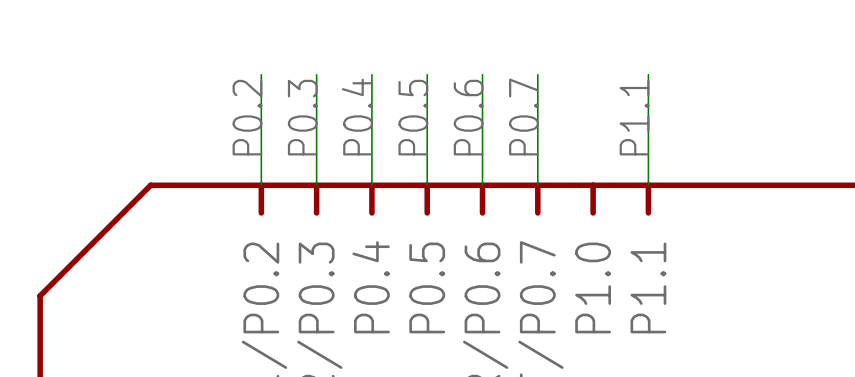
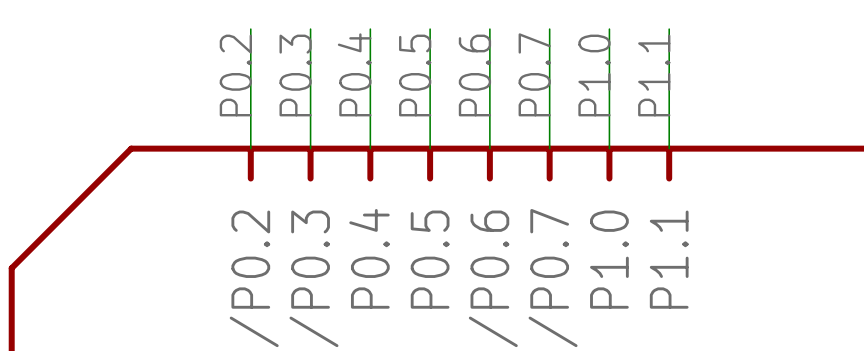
wire: none -> (609, 29) (609, 148)
label: none -> P1.0 (594, 75)

